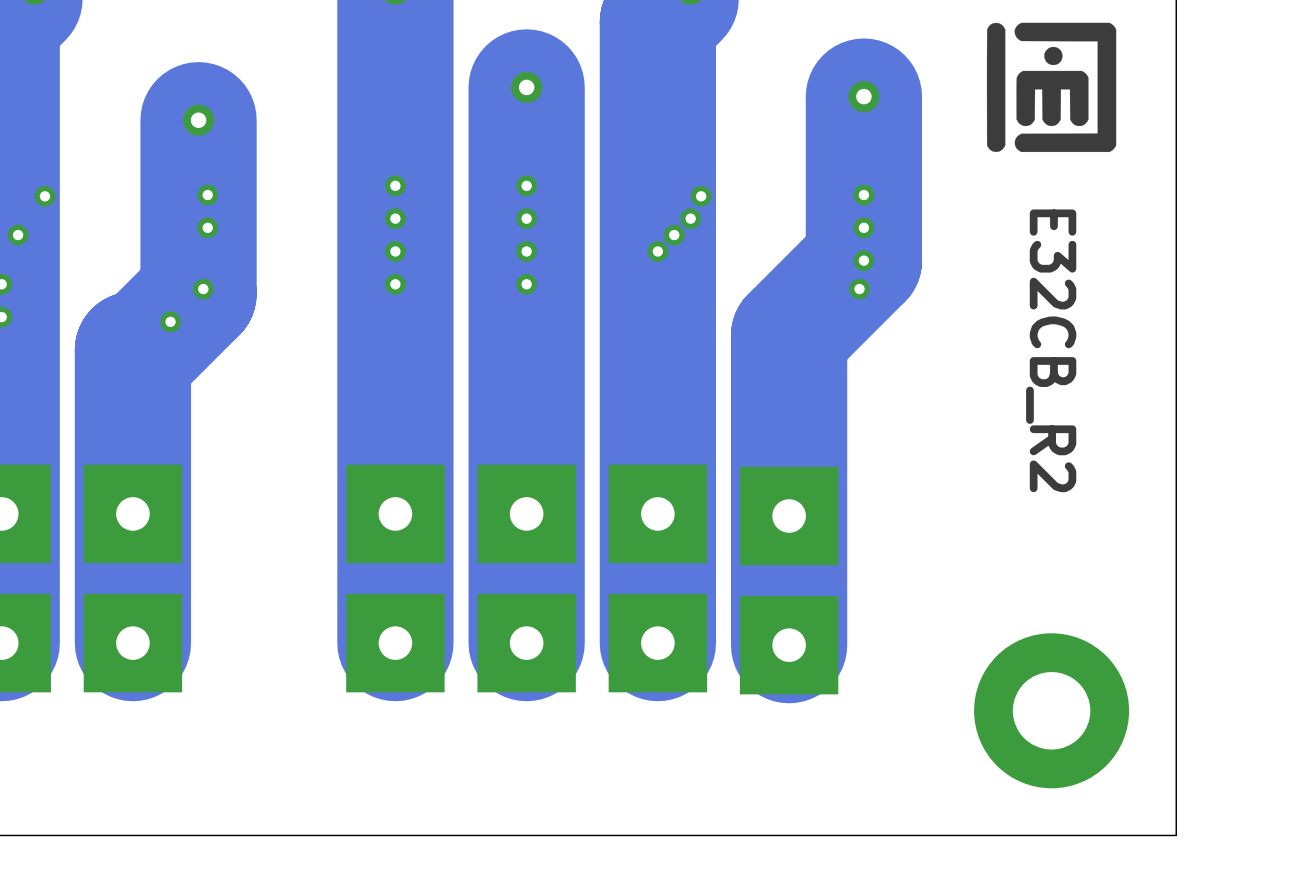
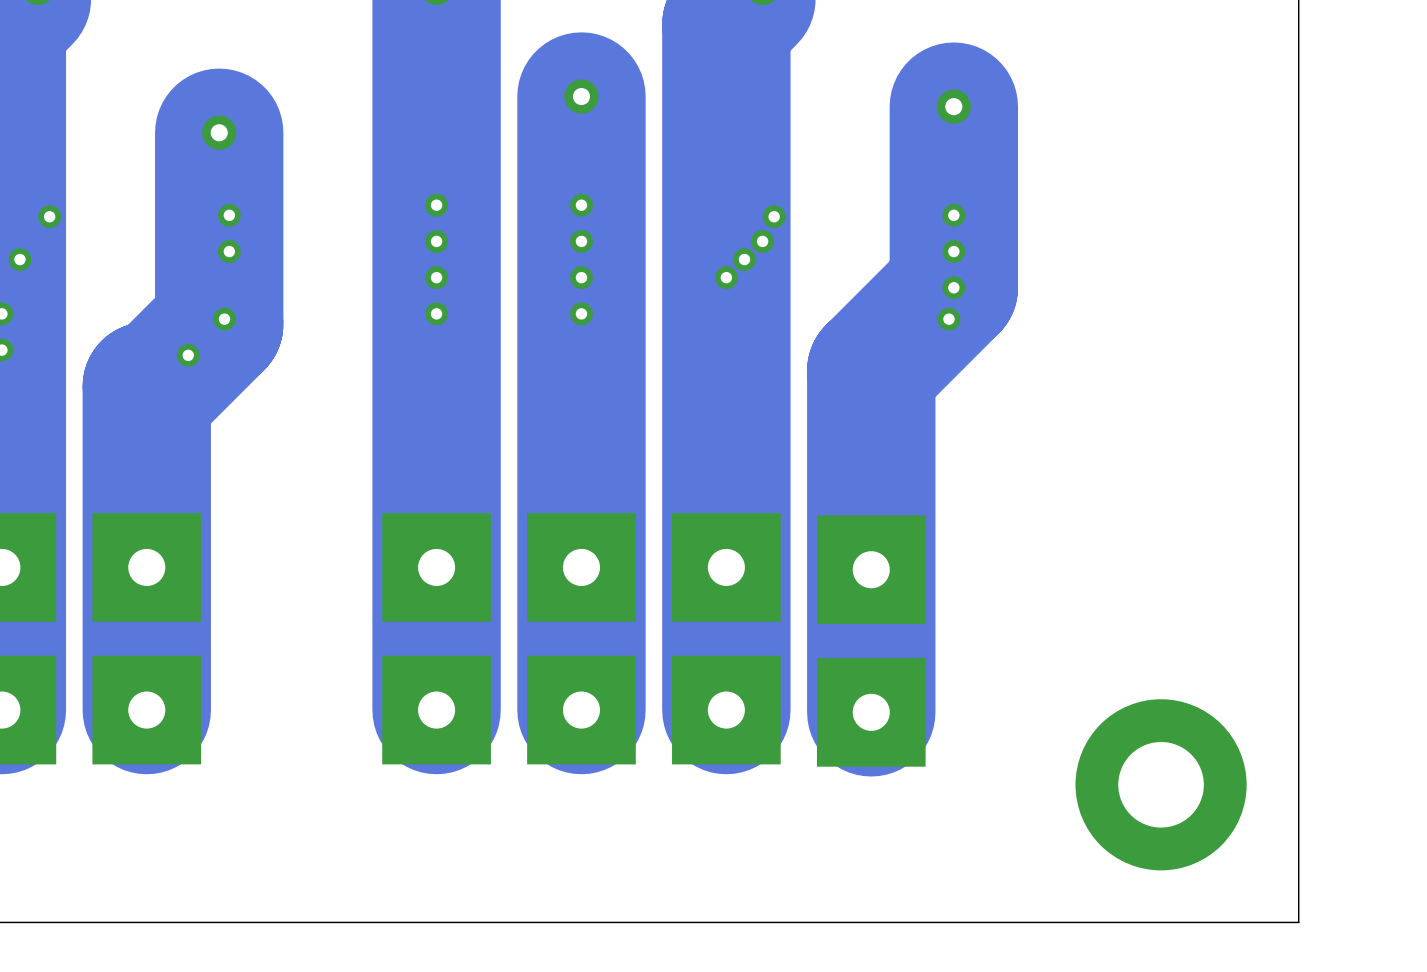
drawing: [986, 22, 1117, 153] -> none
text: E32CB_R2 (1051, 350) -> none

